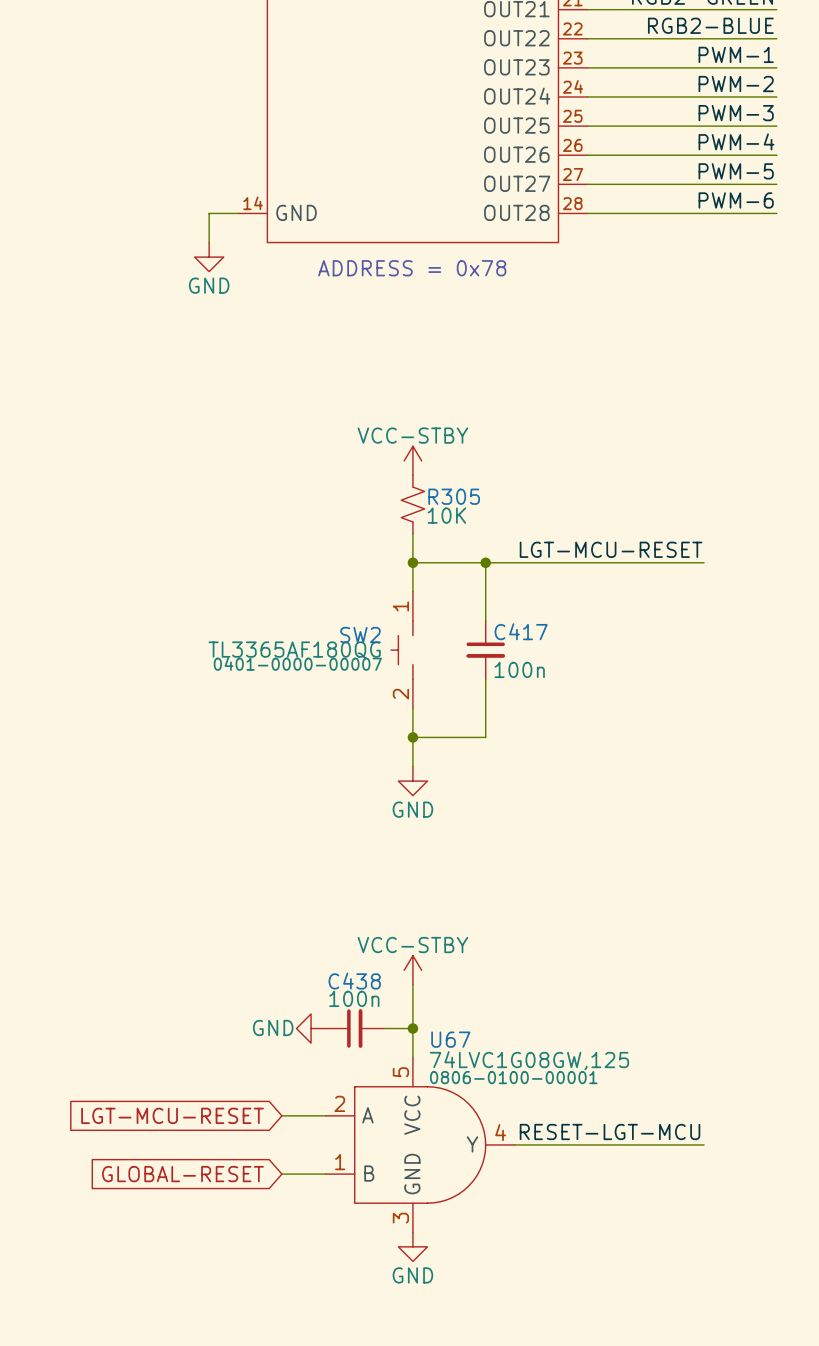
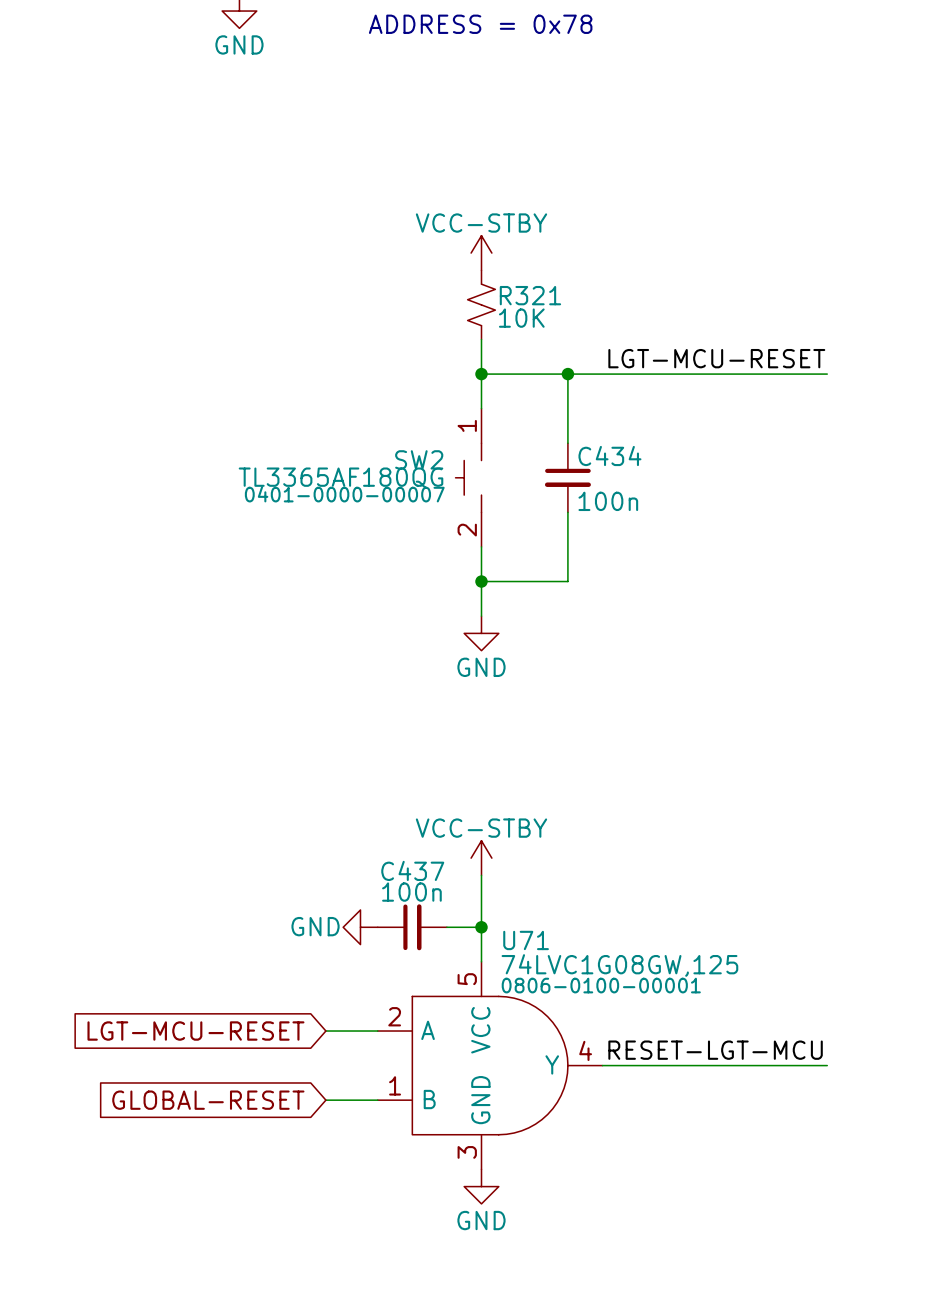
R305 name: R305 (454, 496) -> R321 (530, 295)
C417 name: C417 (521, 631) -> C434 (609, 456)
C438 name: C438 (354, 981) -> C437 (412, 870)
U67 name: U67 (450, 1039) -> U71 (526, 940)

